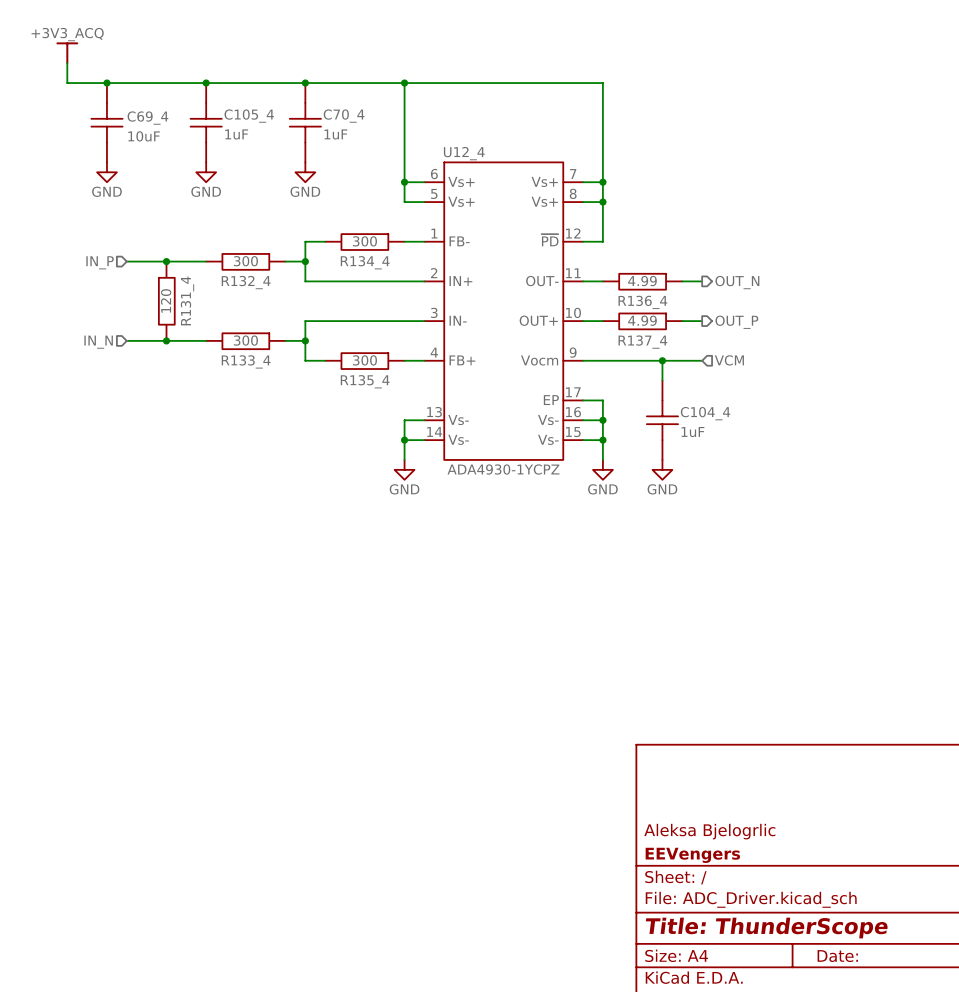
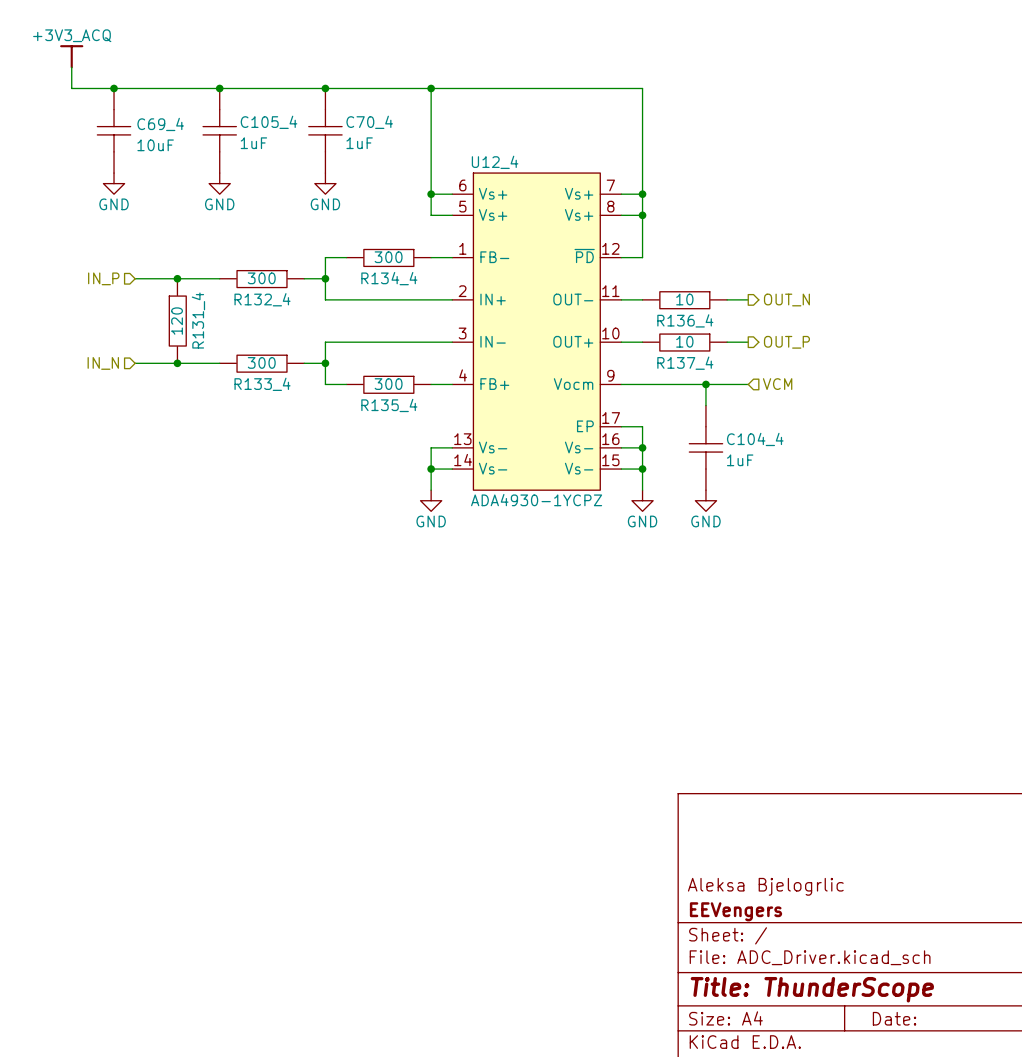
R136_4 value: 4.99 (642, 281) -> 10 (684, 299)
R137_4 value: 4.99 (642, 320) -> 10 (684, 341)

